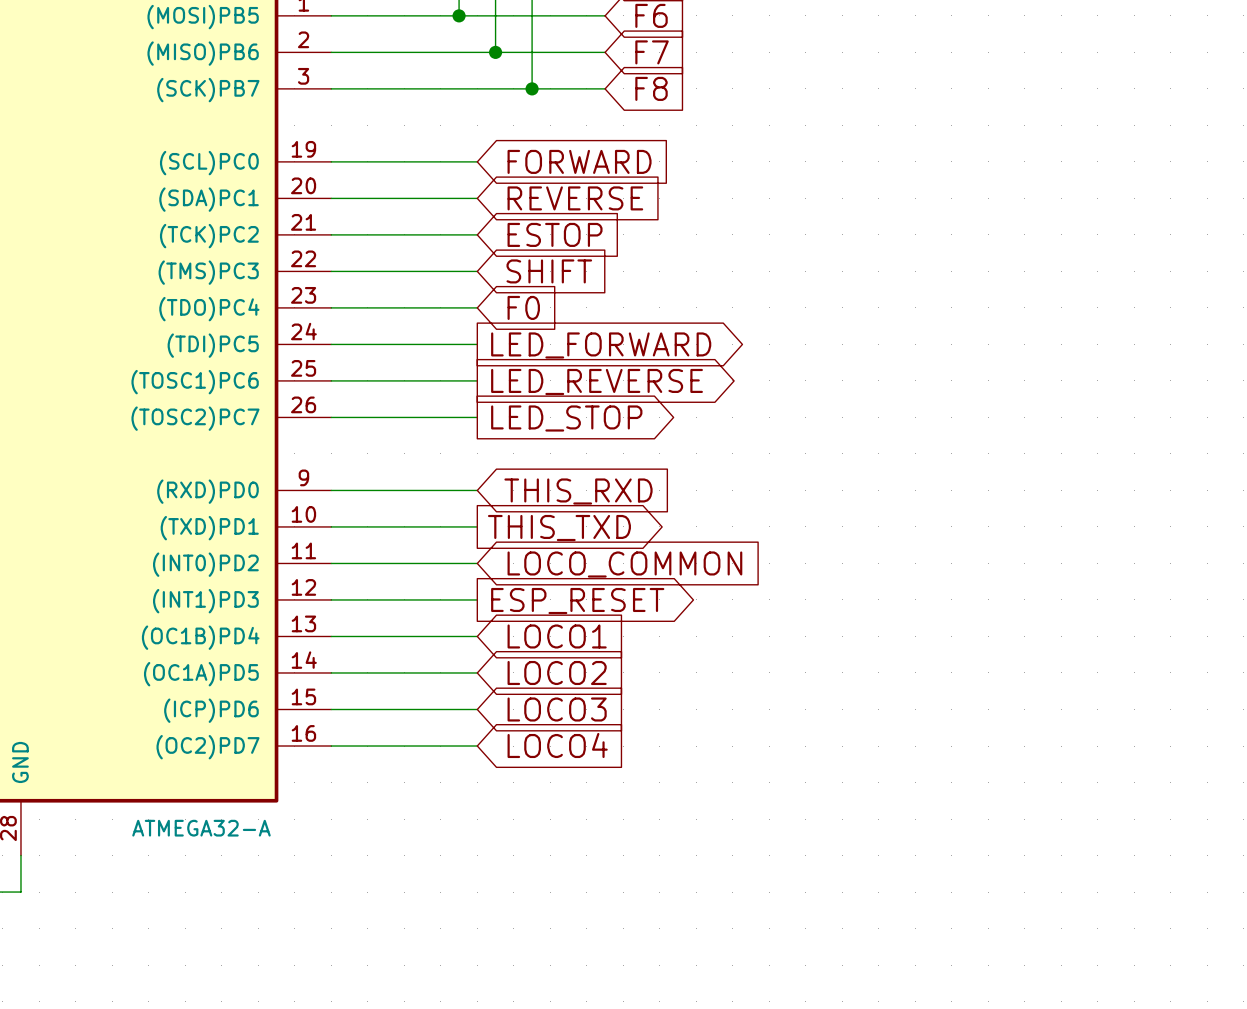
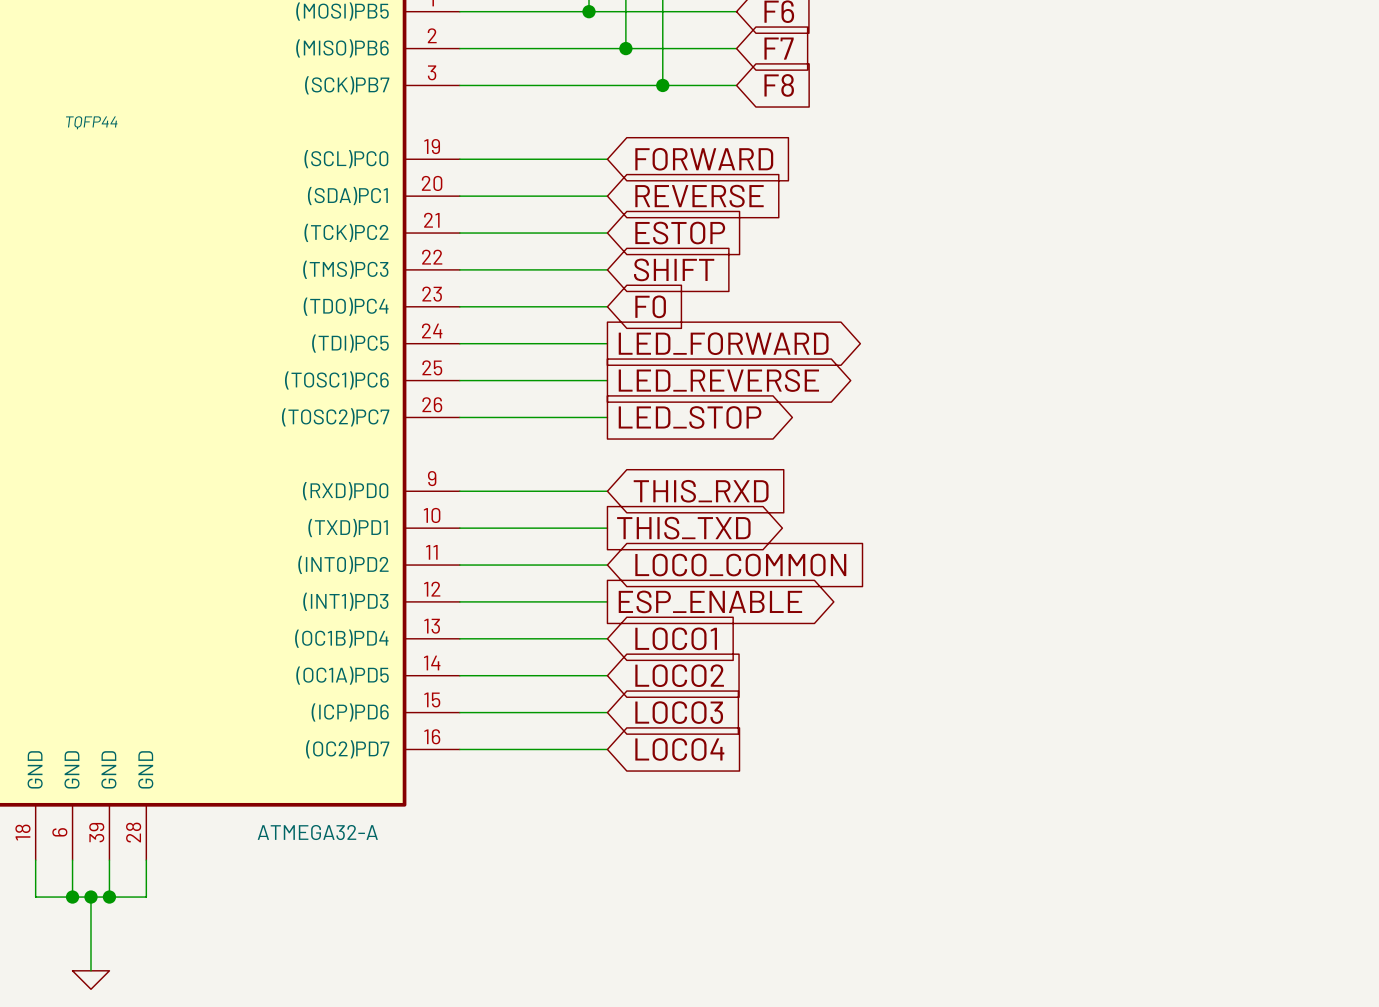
global label: ESP_RESET (577, 601) -> ESP_ENABLE (710, 601)

